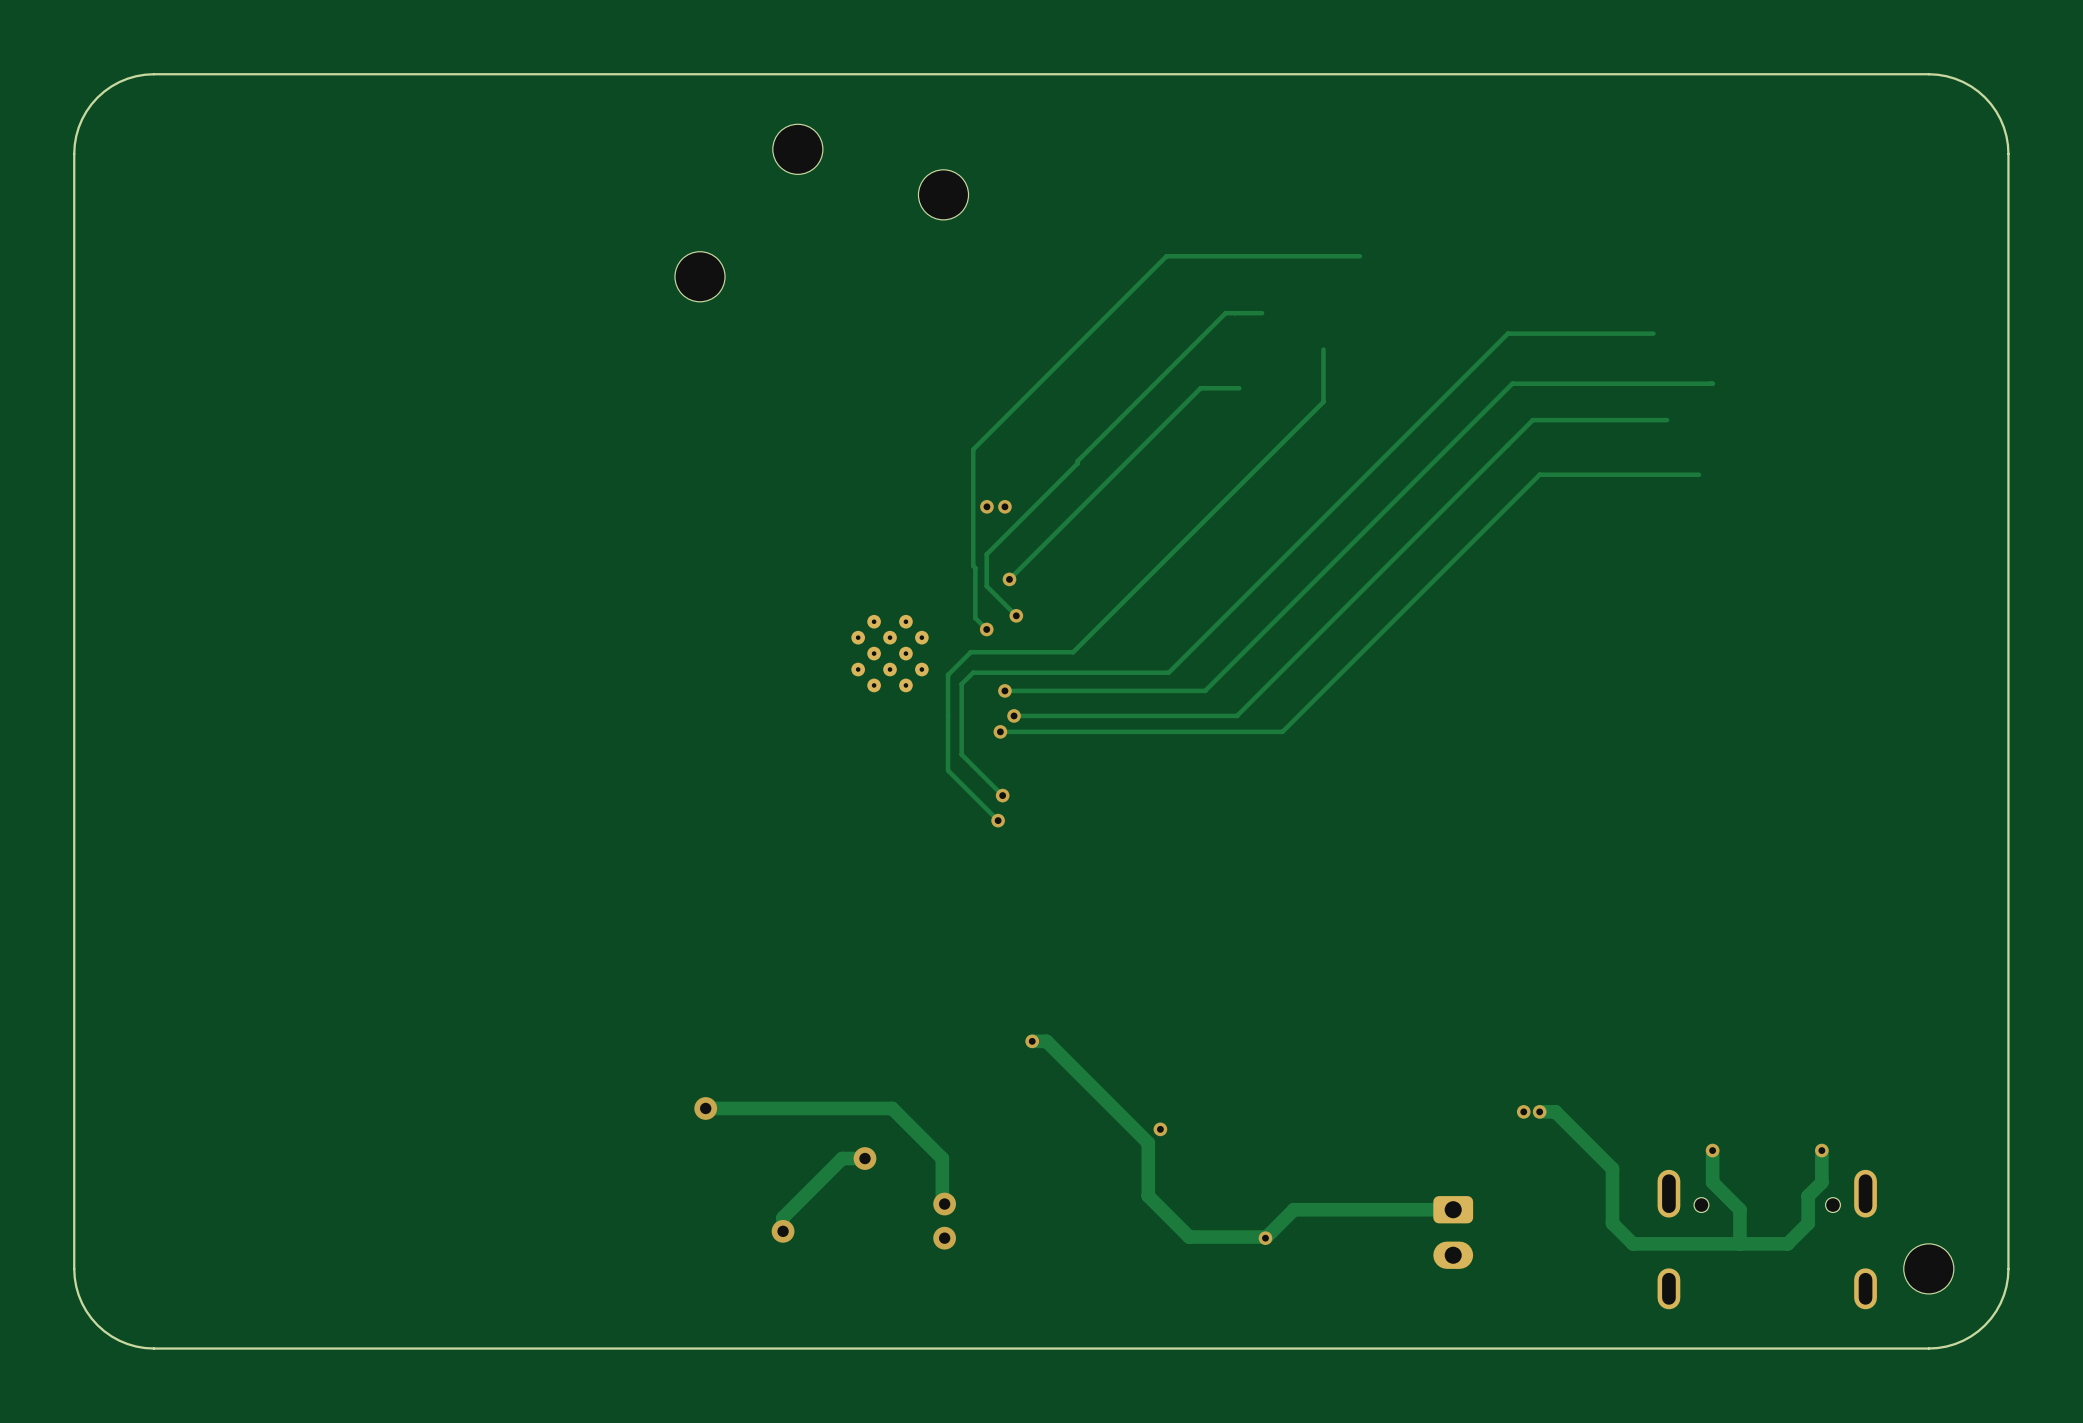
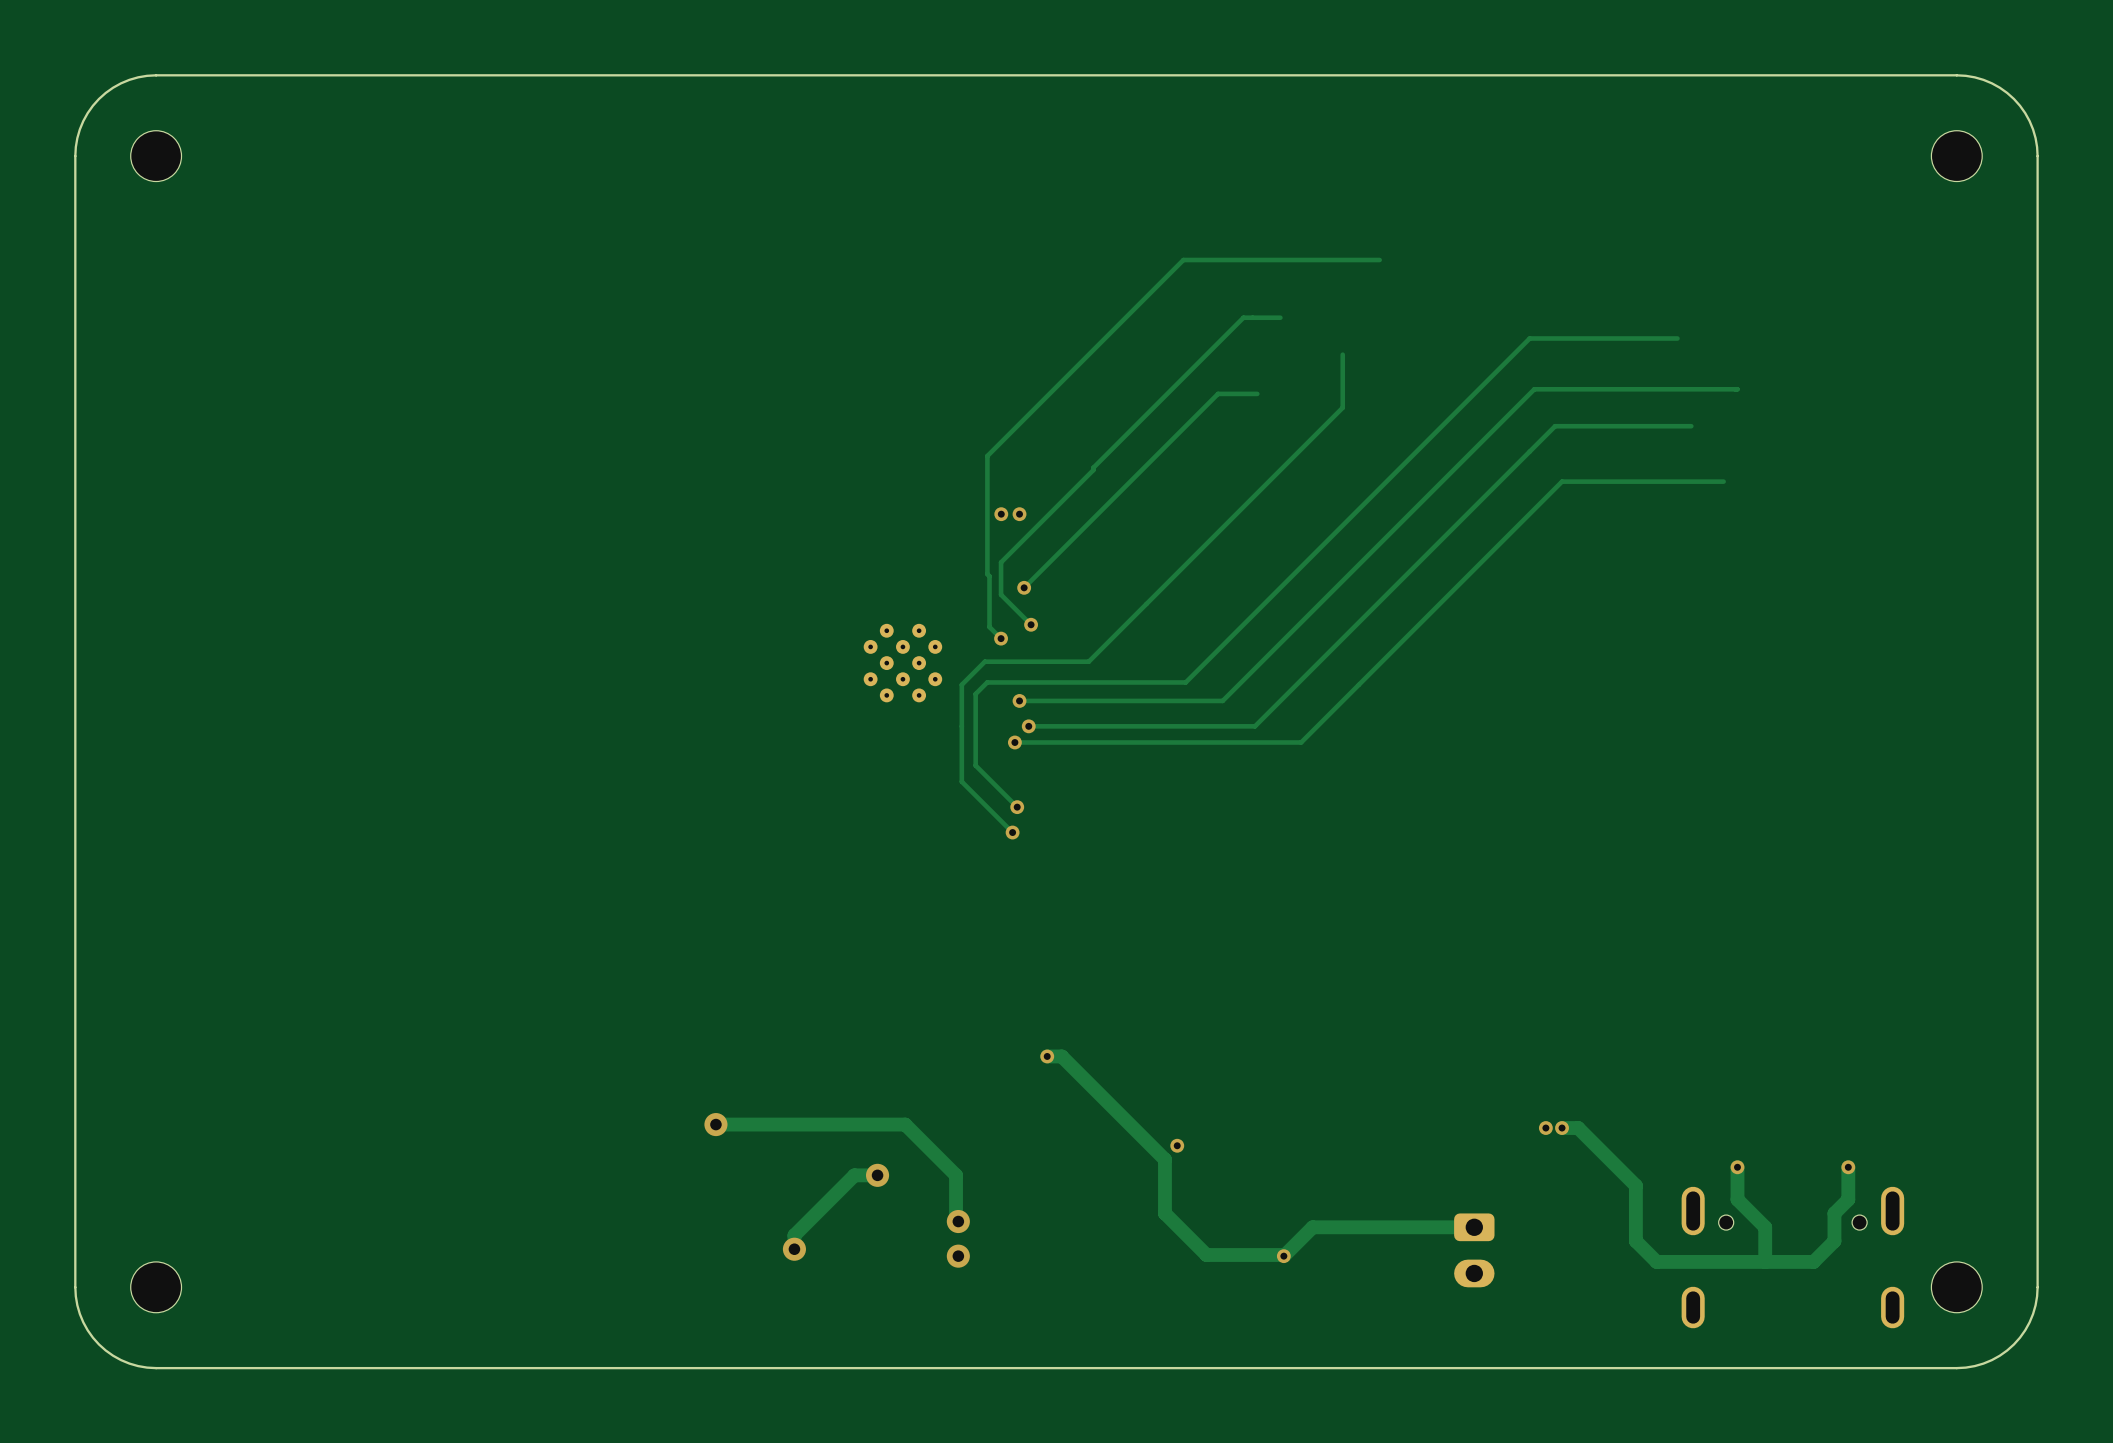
part: (797, 149) -> none
part: none -> (156, 156)
part: none -> (1956, 156)
part: (943, 194) -> none
part: (700, 276) -> none
part: none -> (156, 1287)

